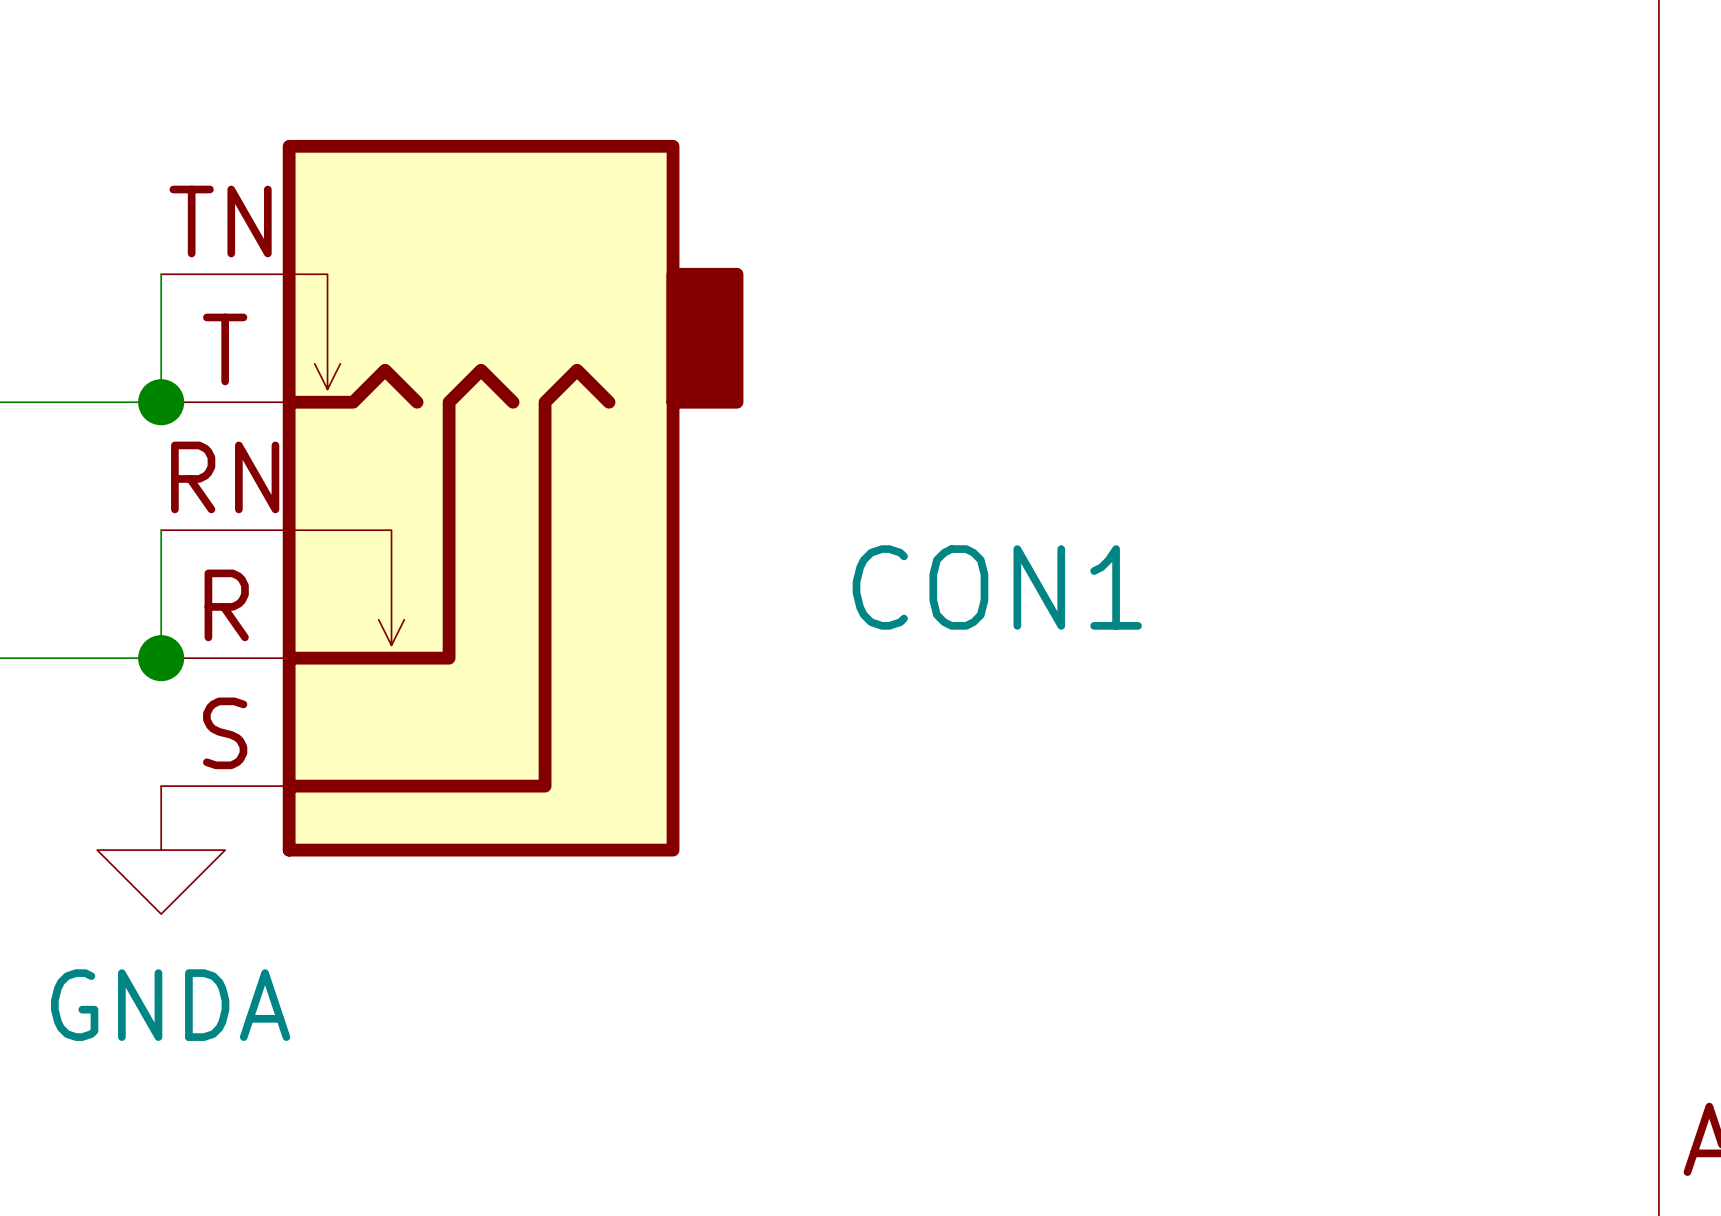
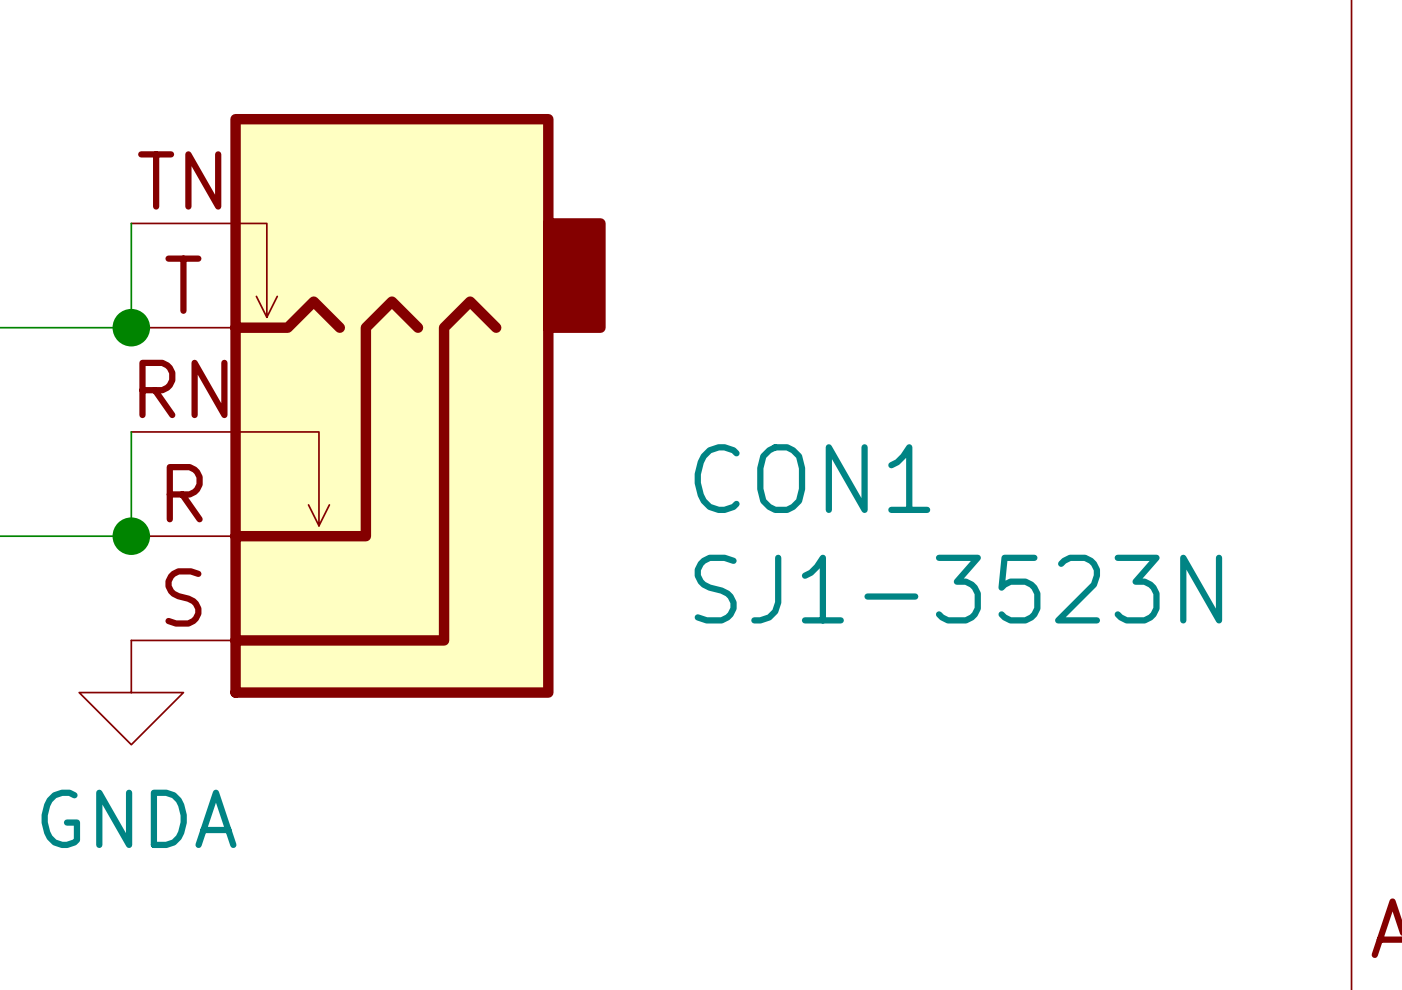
CON1 value: none -> SJ1-3523N (958, 589)

